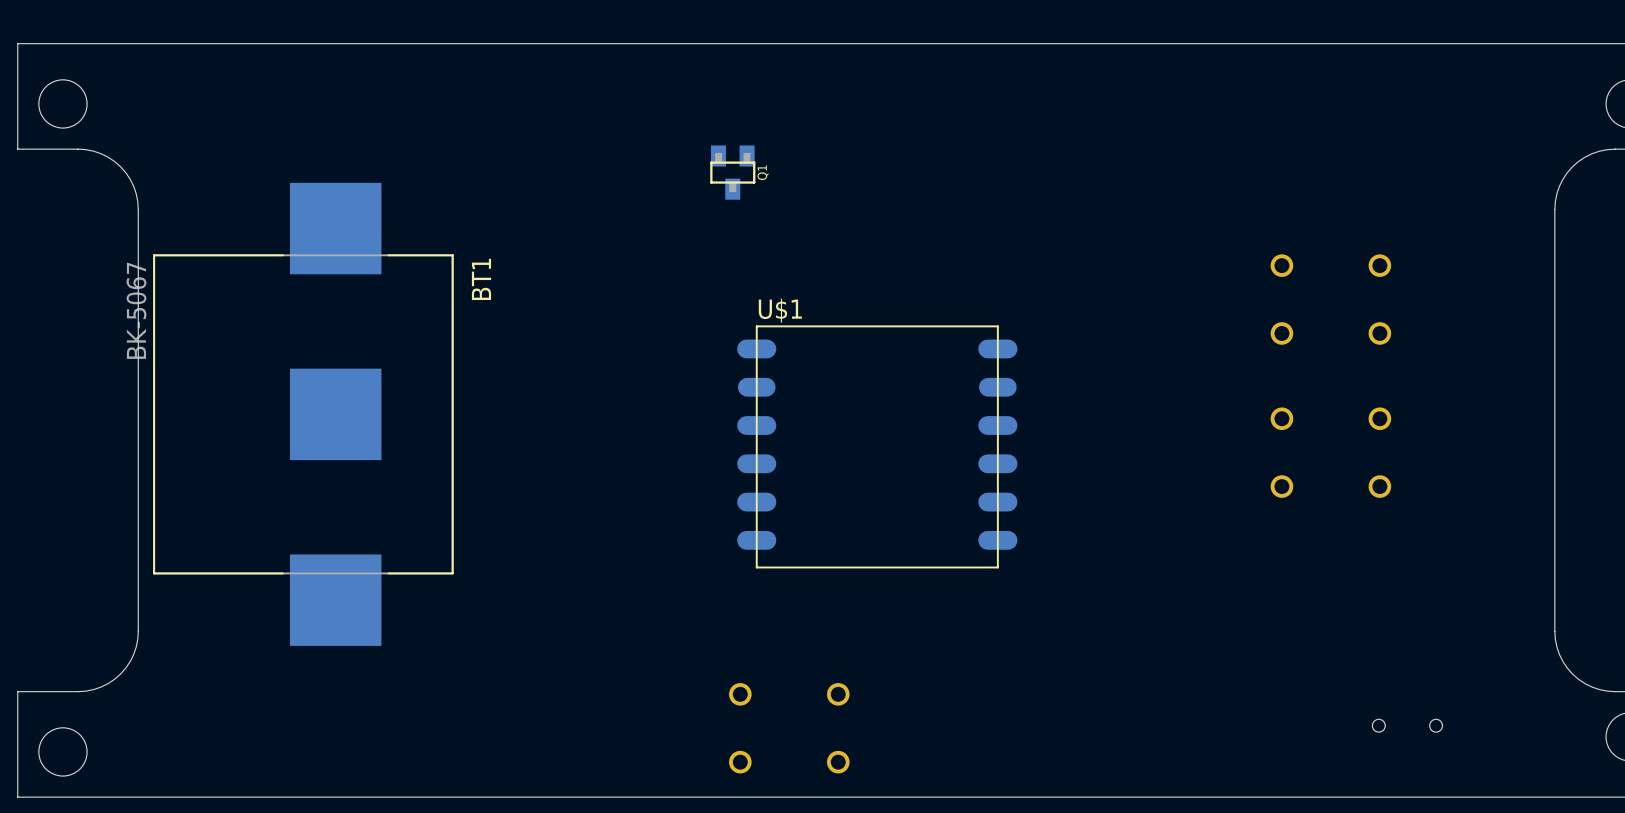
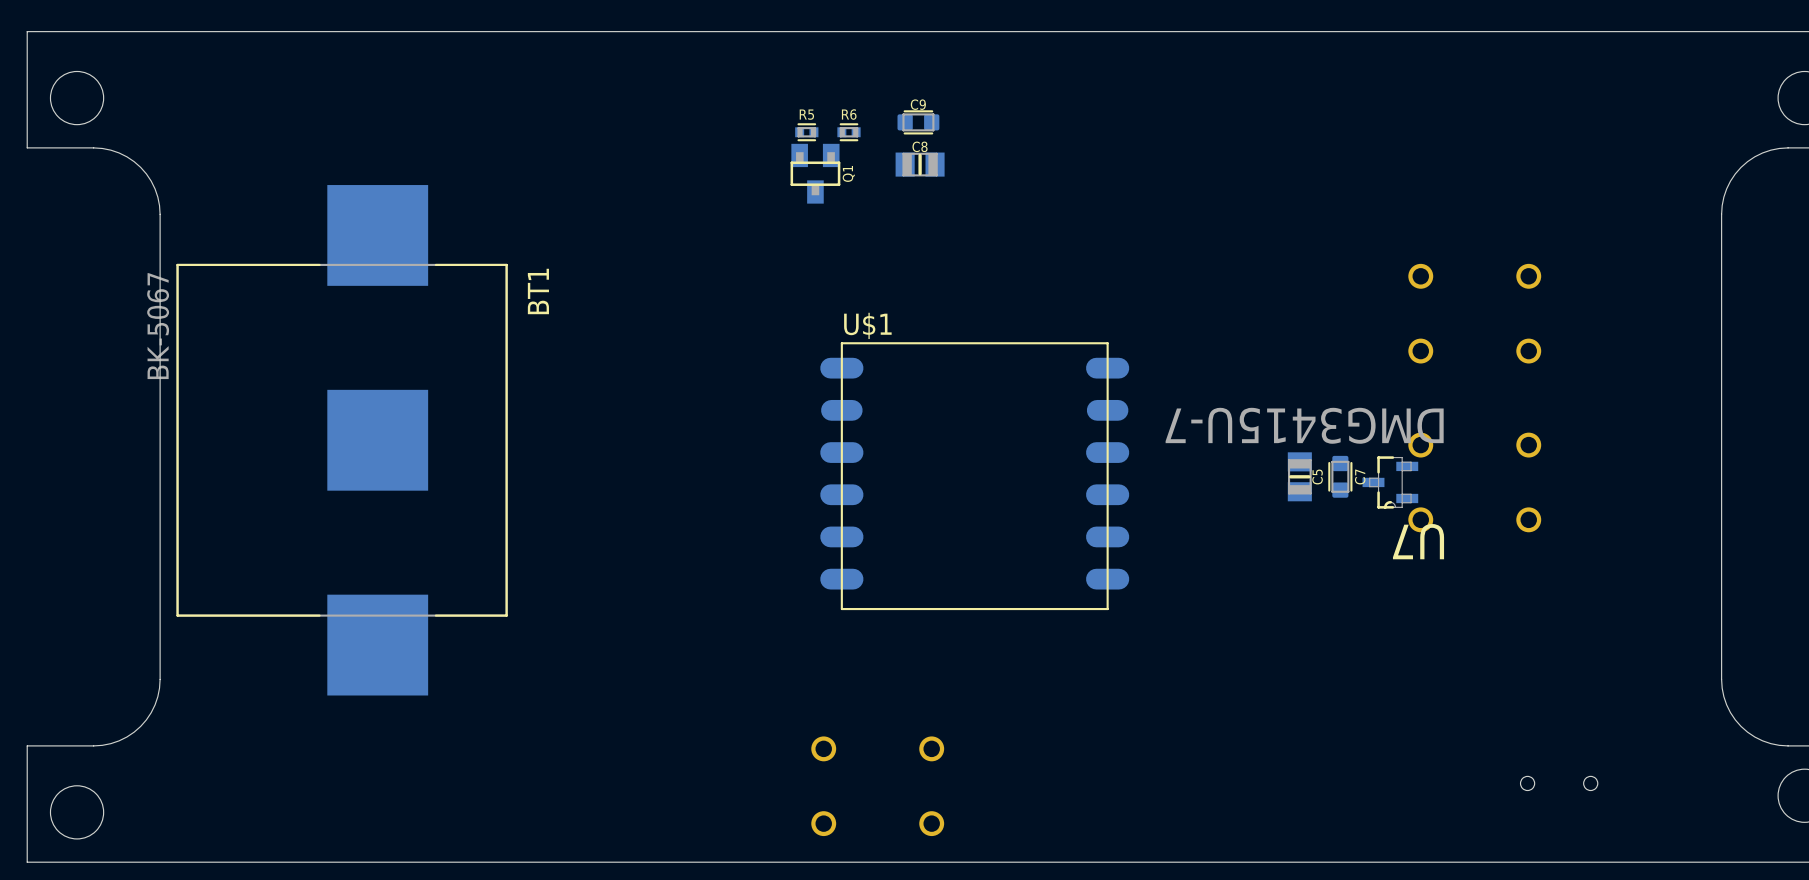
C9: none -> (918, 122)
R5: none -> (806, 132)
R6: none -> (848, 132)
C8: none -> (920, 164)
C5: none -> (1299, 476)
C7: none -> (1340, 476)
U7: none -> DMG3415U-7 (1390, 482)

